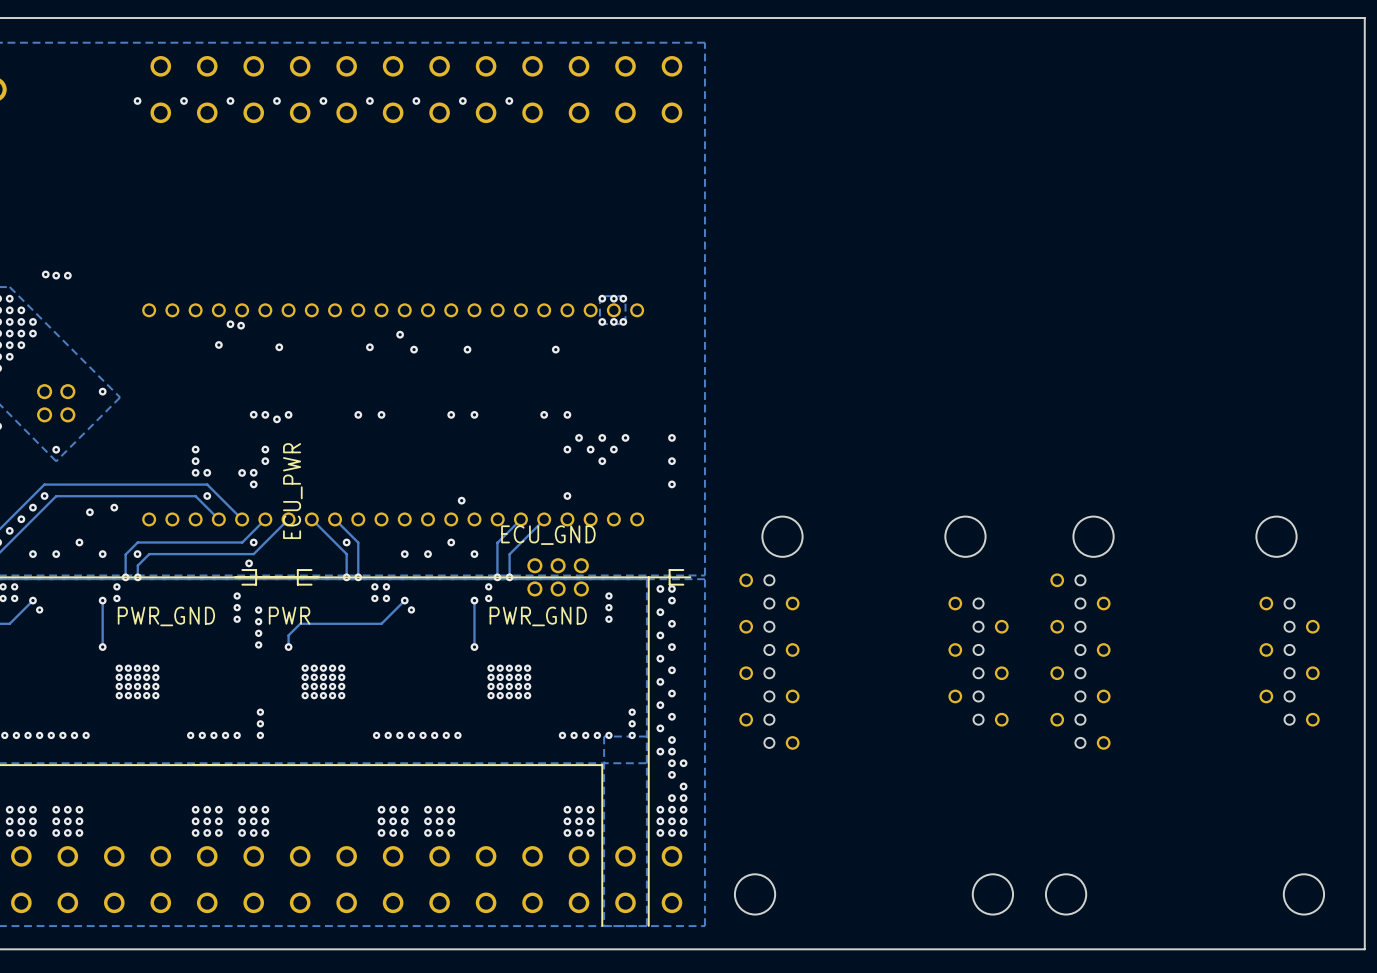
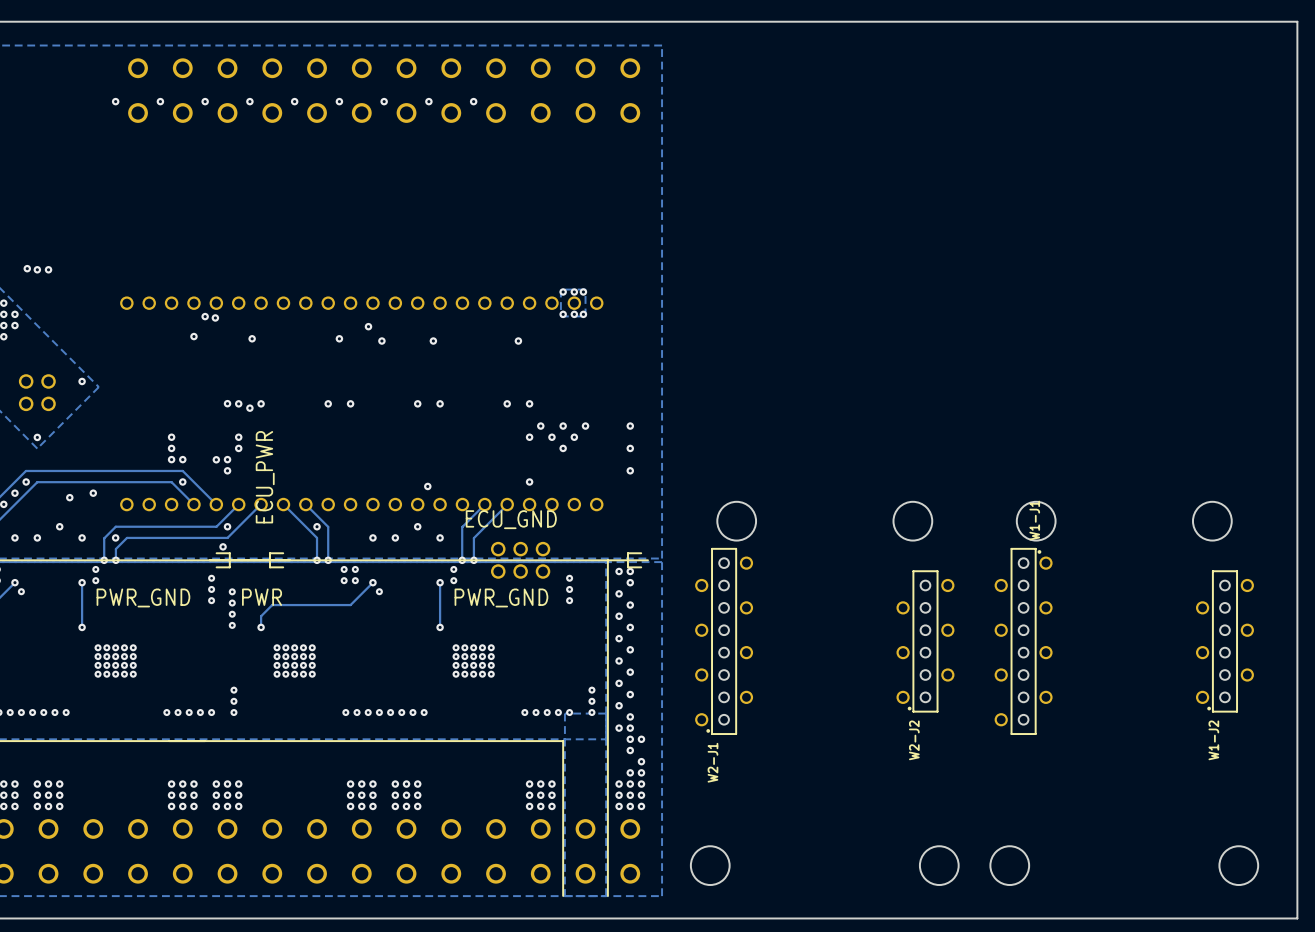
W2-J1 side: top (769, 661) -> bottom (724, 641)
W2-J2 side: top (978, 661) -> bottom (925, 641)
W1-J1 side: top (1080, 661) -> bottom (1023, 641)
W1-J2 side: top (1289, 661) -> bottom (1224, 641)

